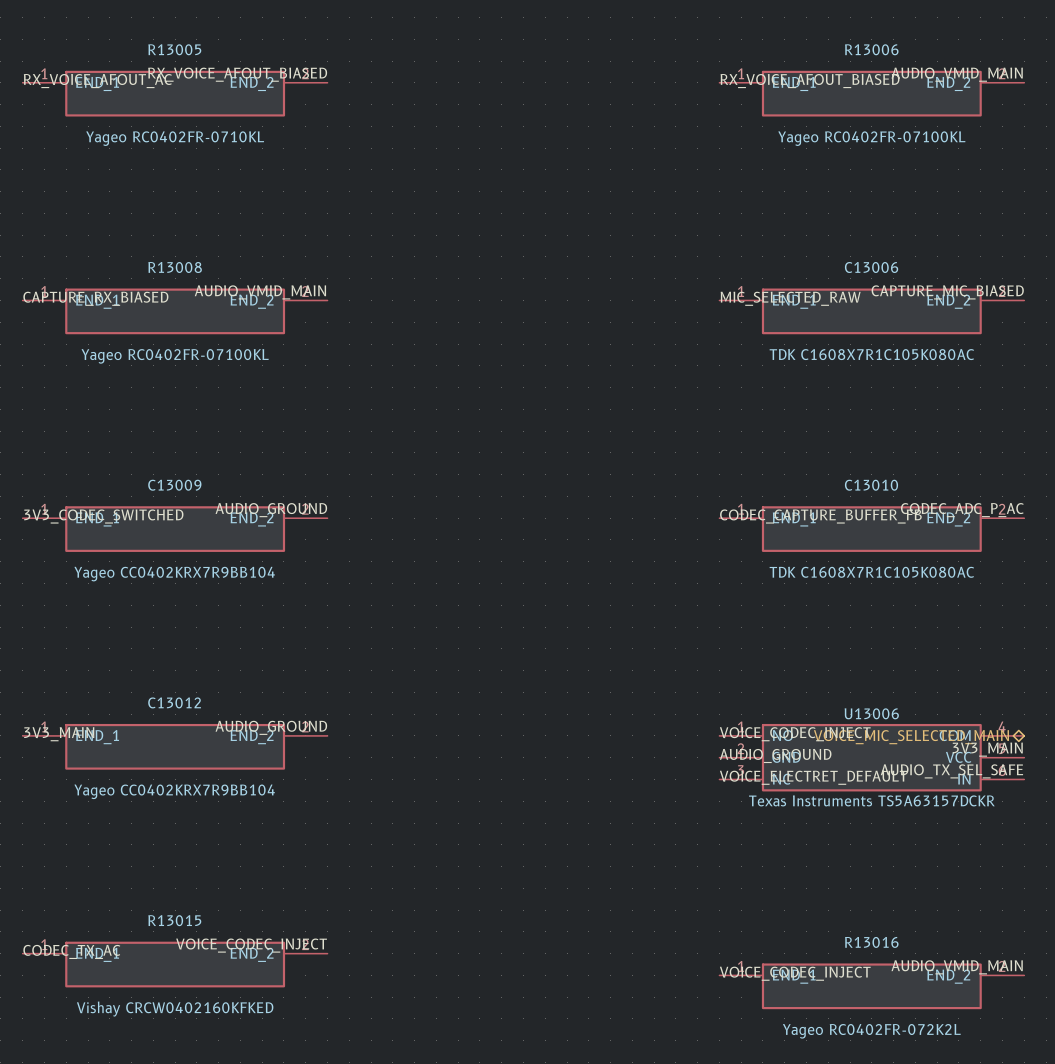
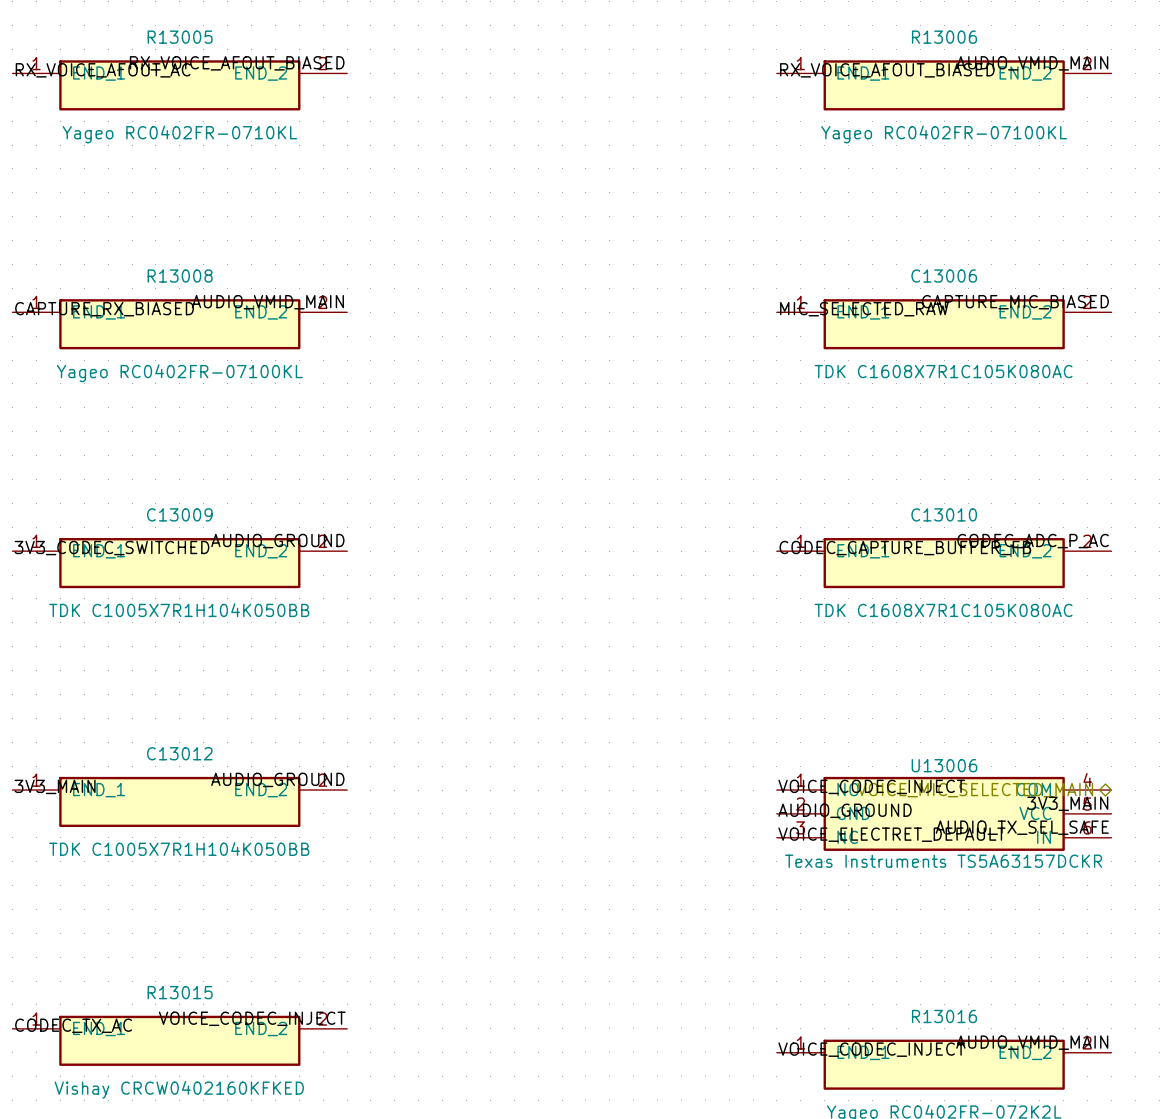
C13009 value: Yageo CC0402KRX7R9BB104 (174, 574) -> TDK C1005X7R1H104K050BB (179, 610)
C13012 value: Yageo CC0402KRX7R9BB104 (174, 791) -> TDK C1005X7R1H104K050BB (179, 849)

